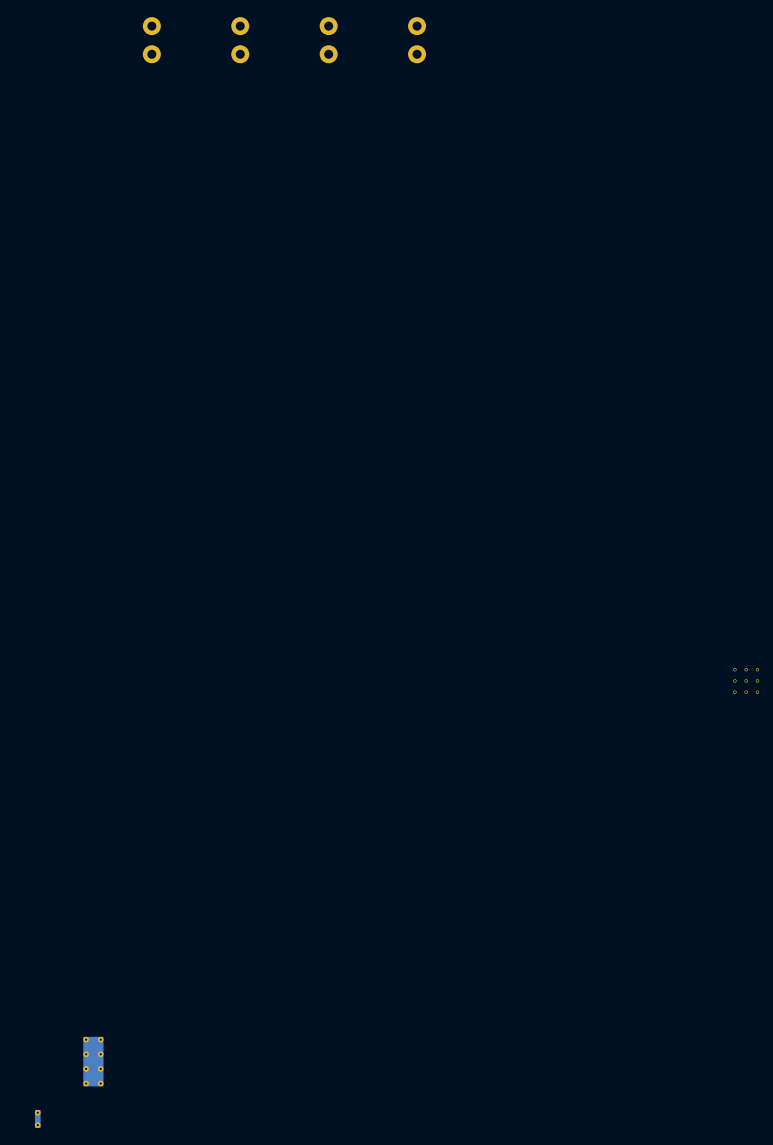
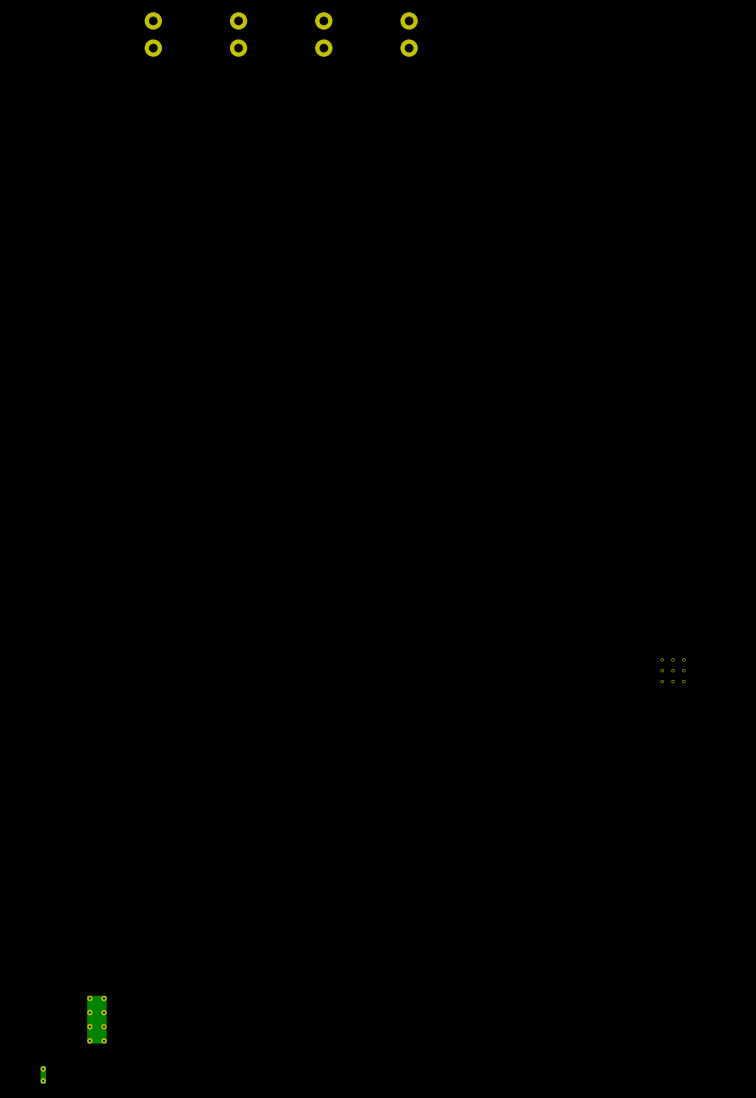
part position: (746, 680) -> (673, 670)

